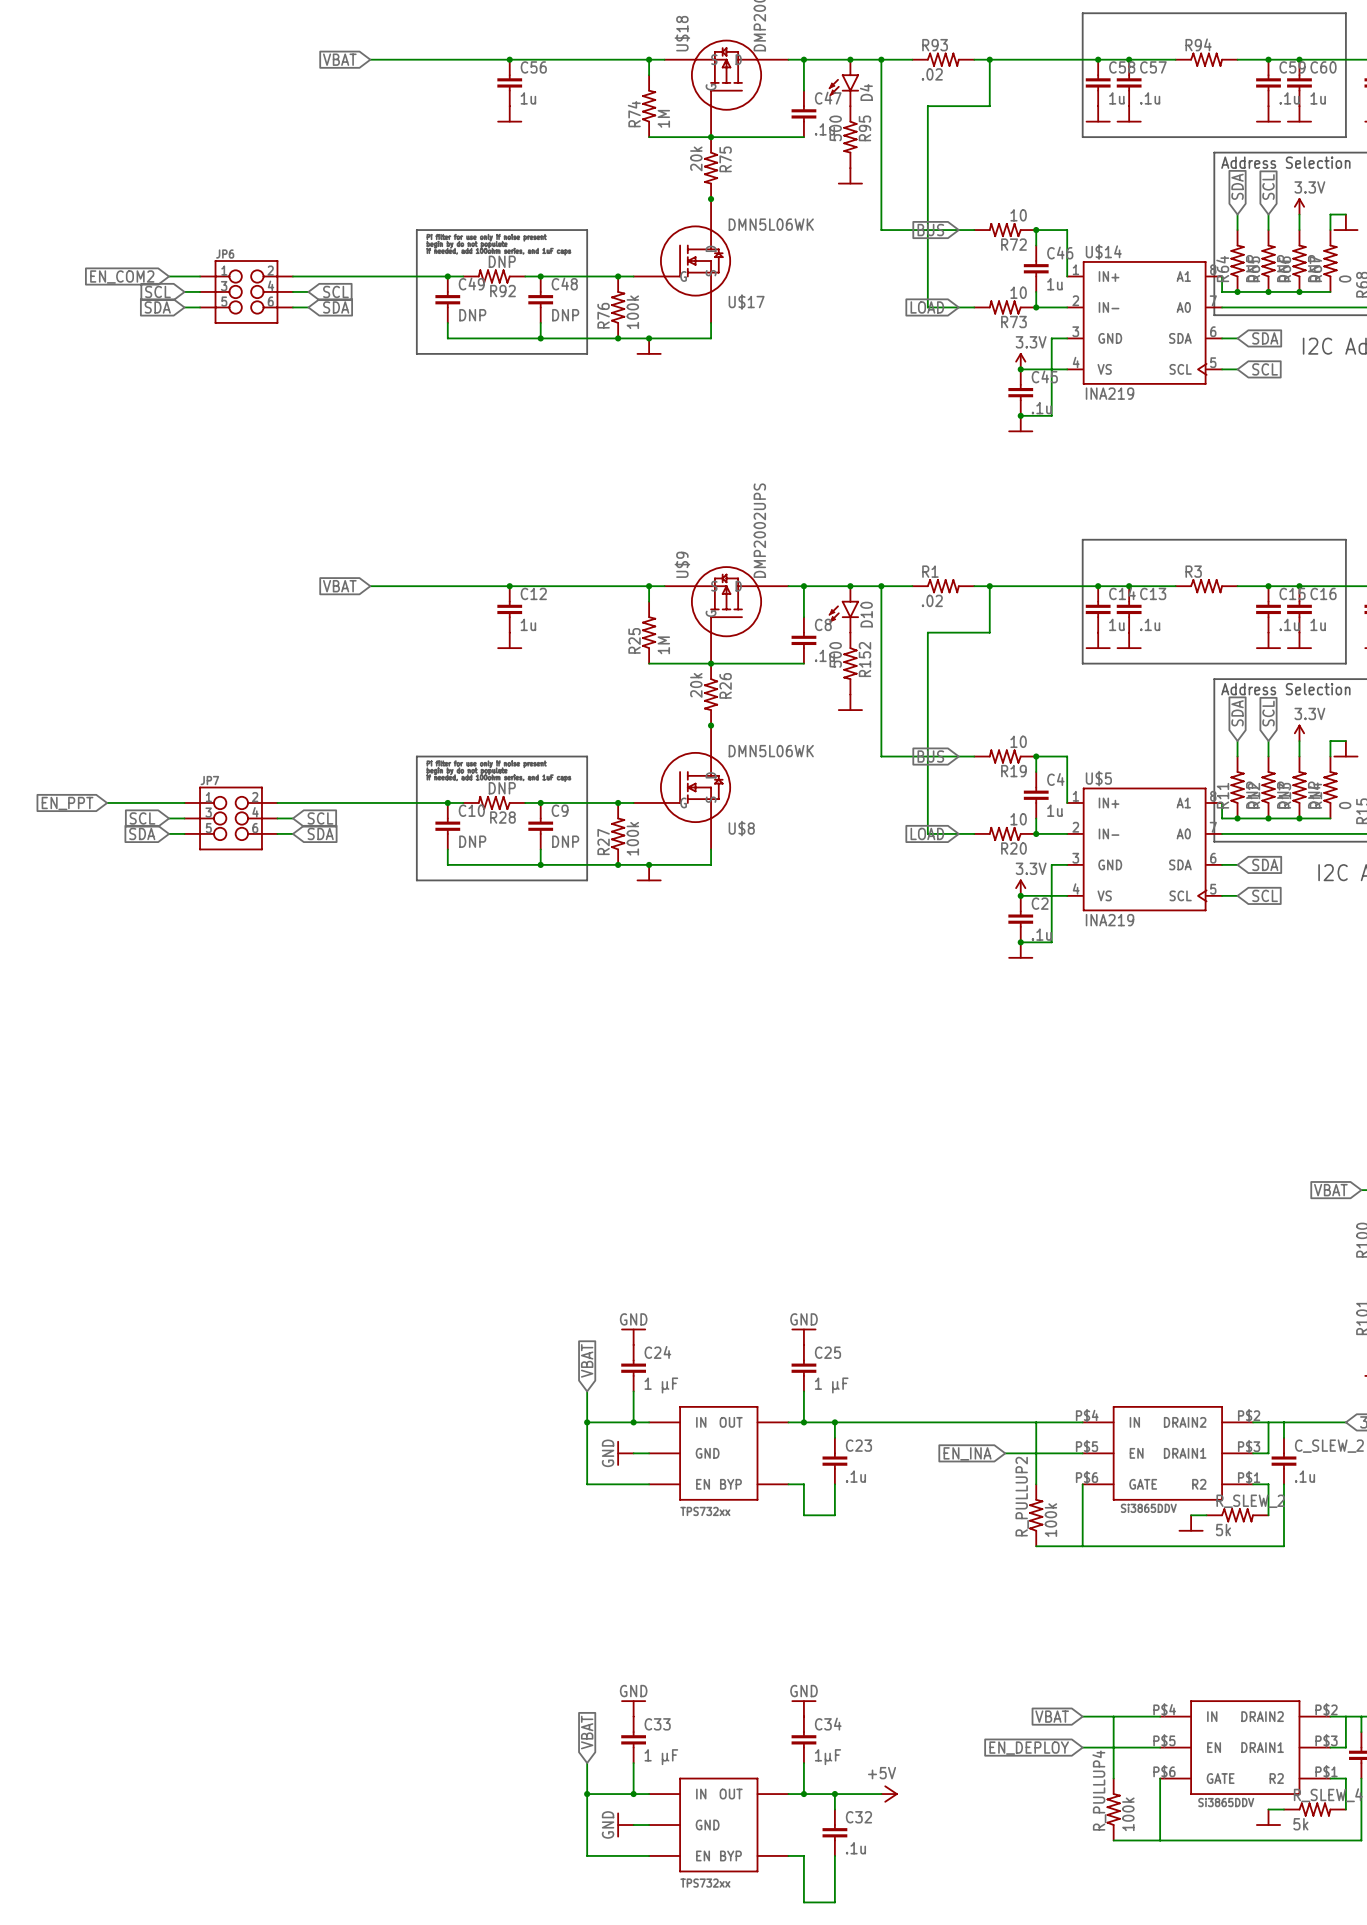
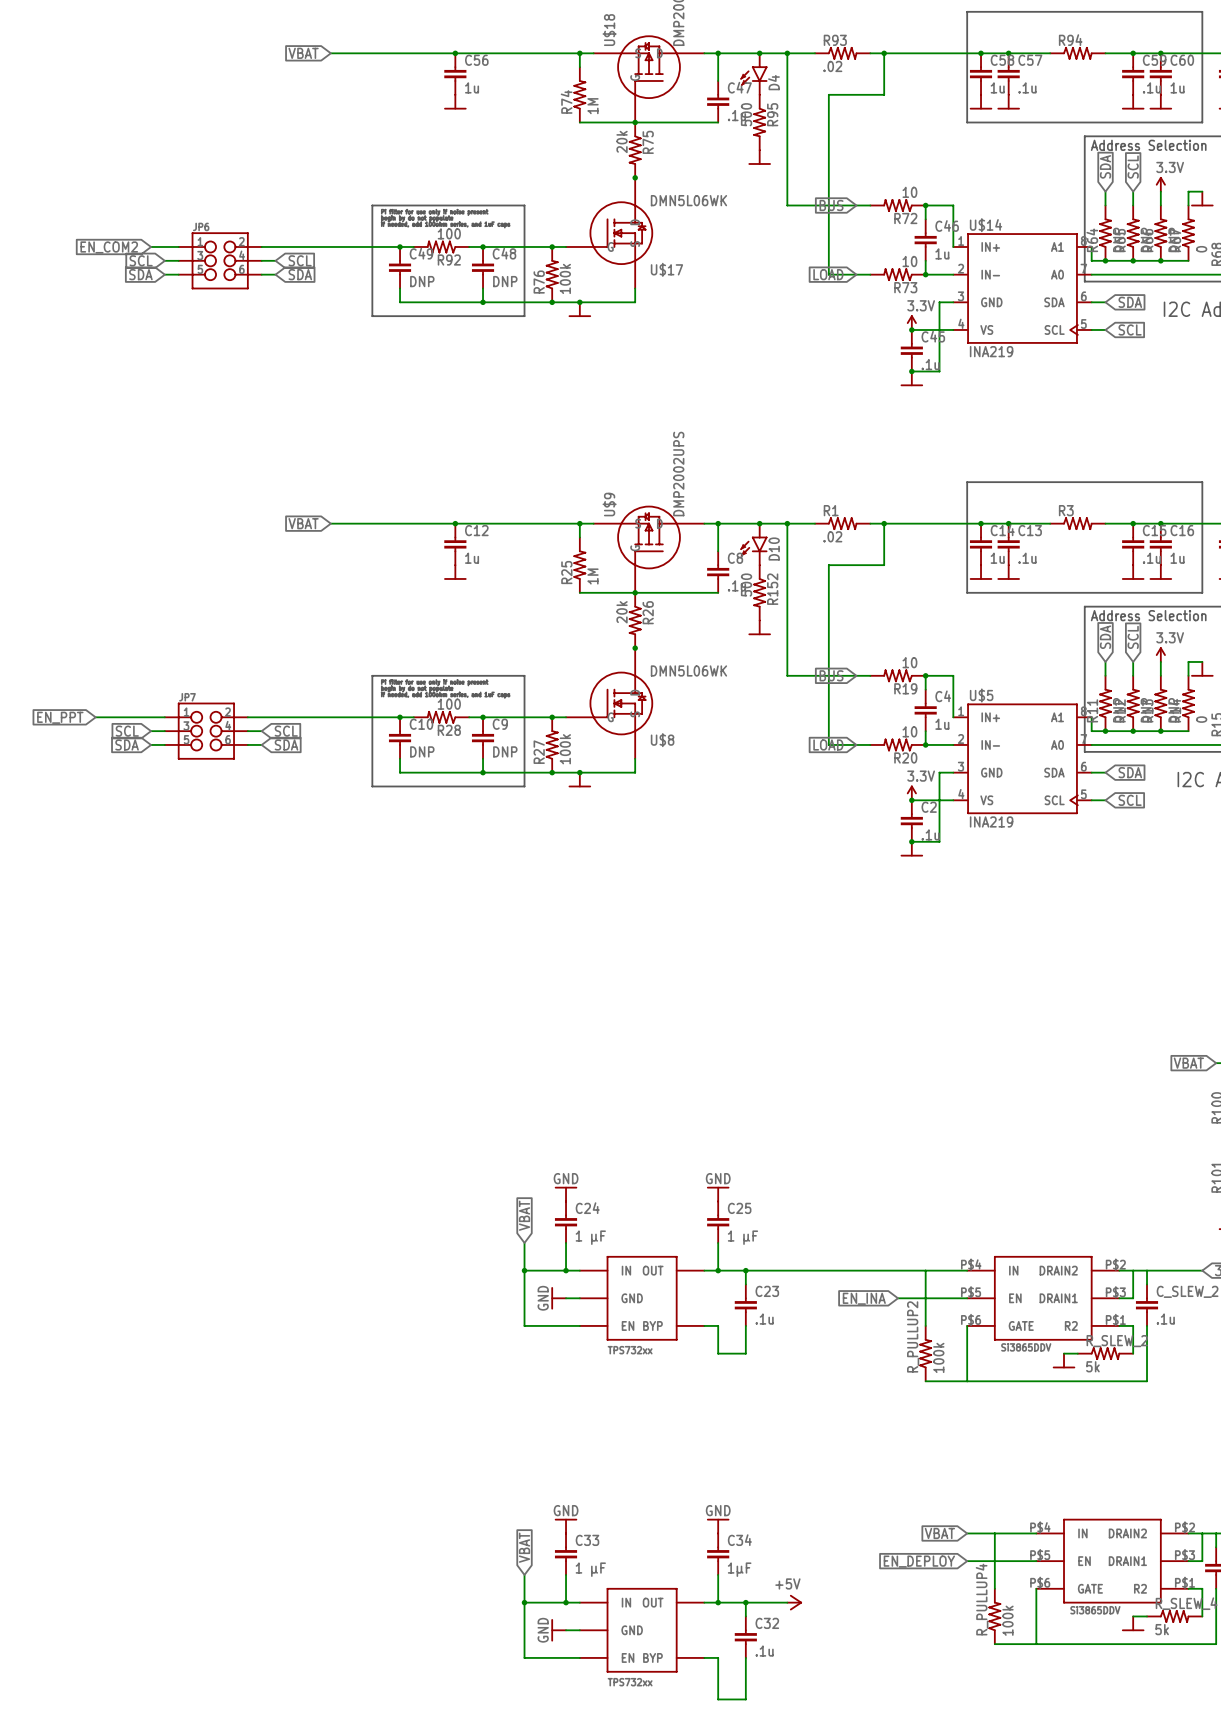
R92 value: DNP (502, 261) -> 100 (449, 233)
R28 value: DNP (502, 788) -> 100 (449, 704)

